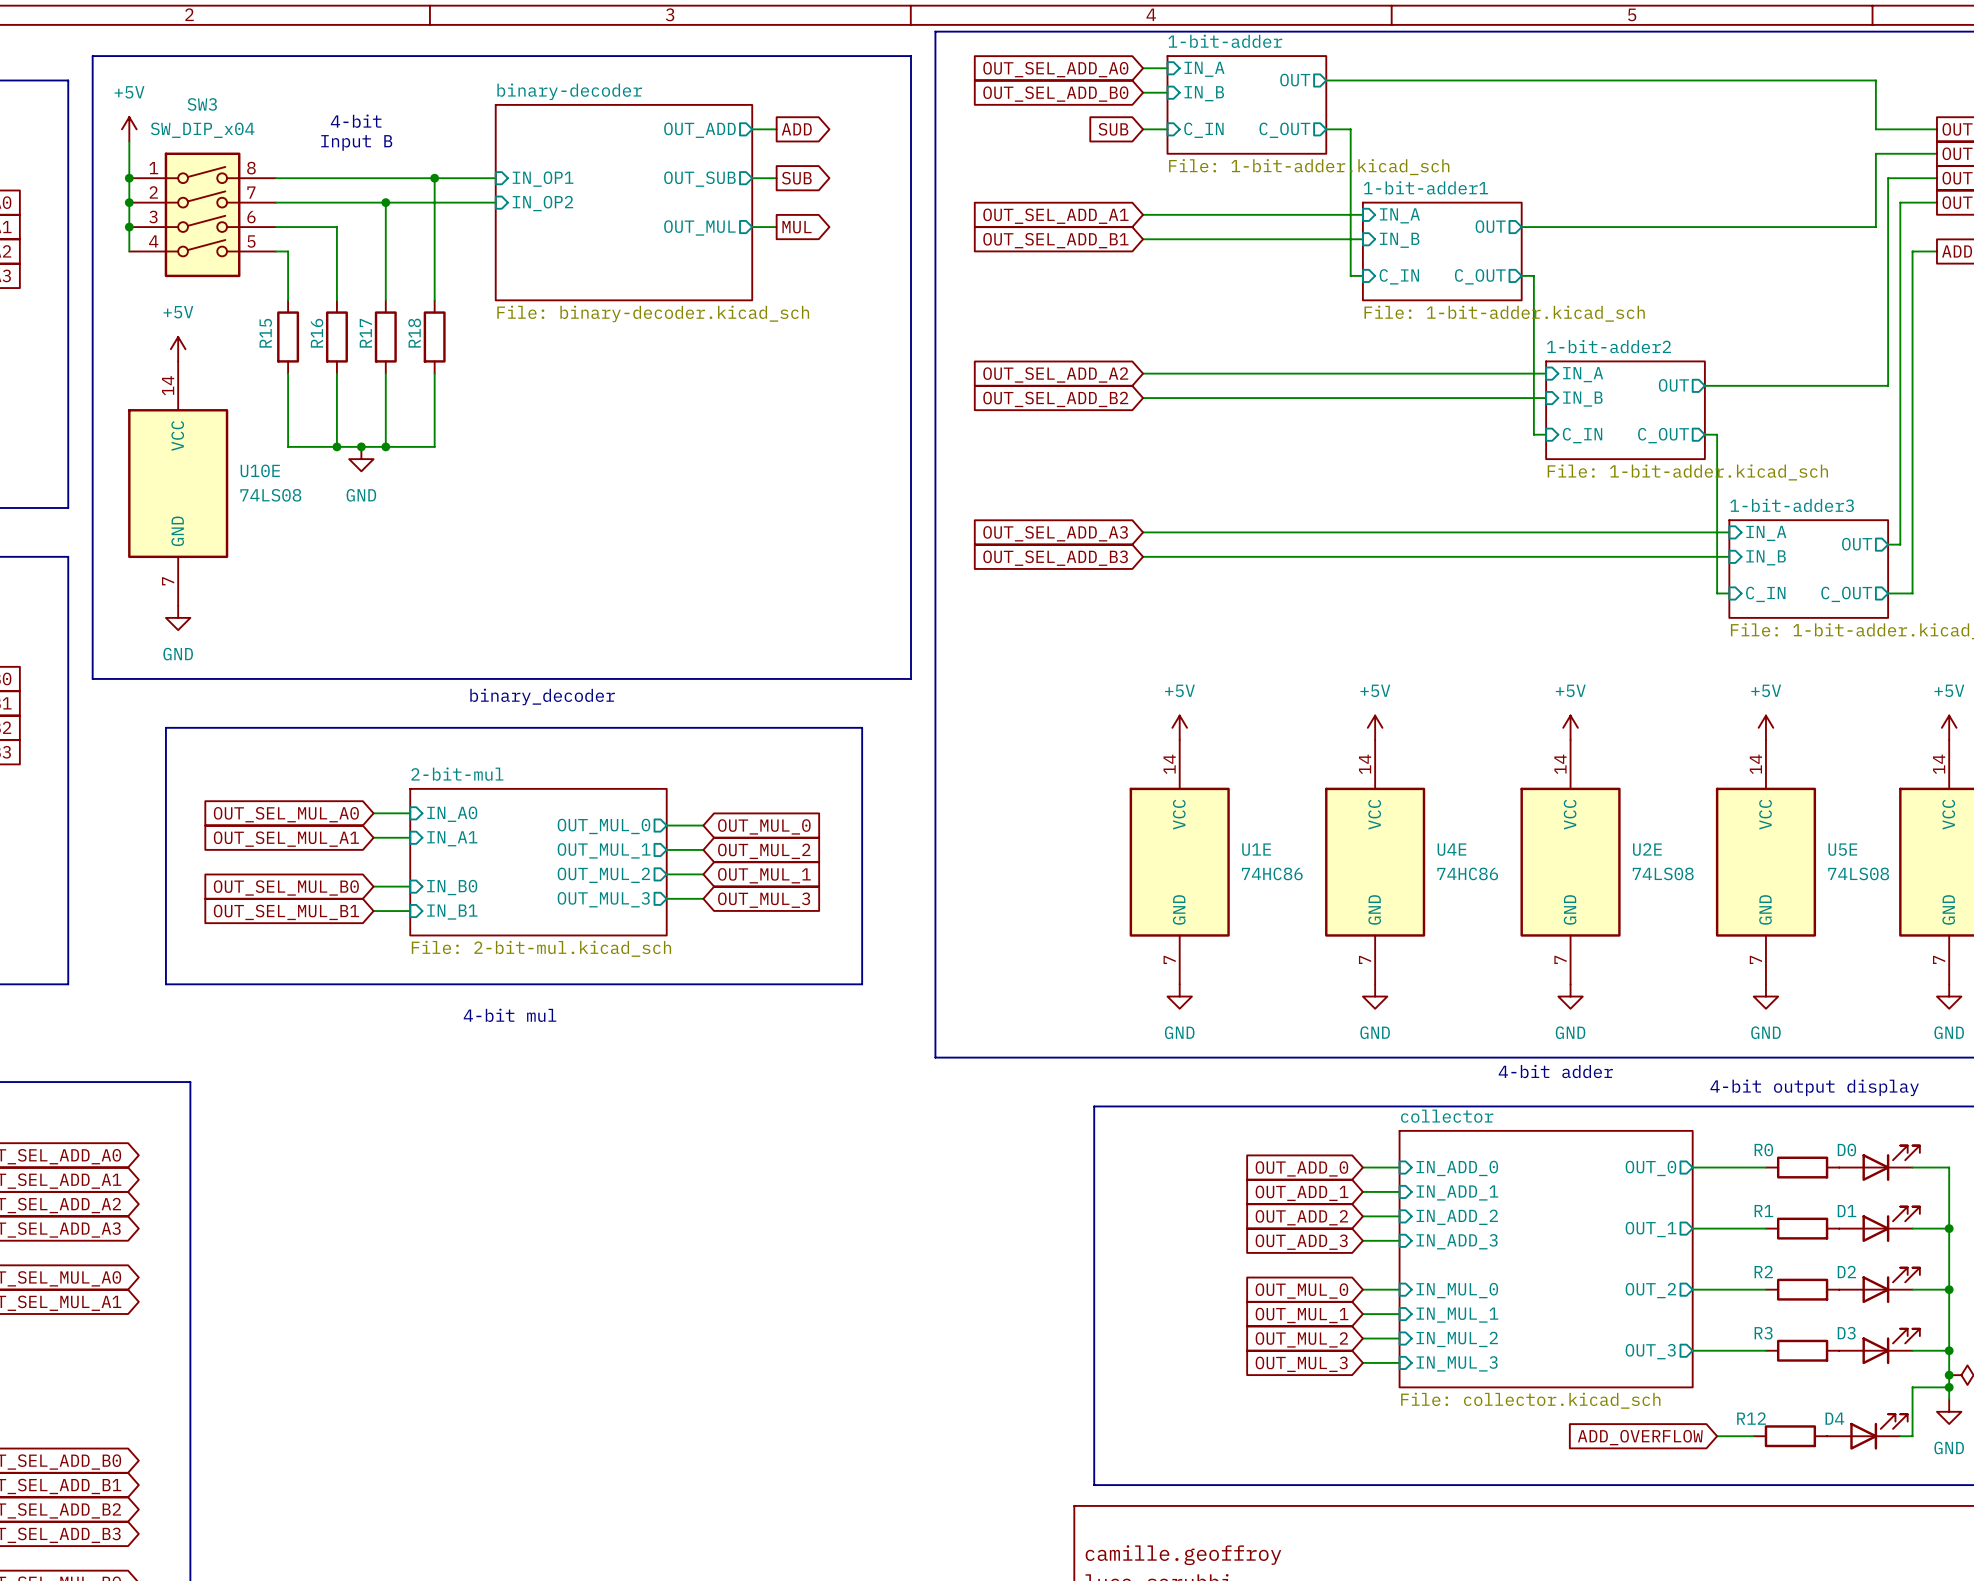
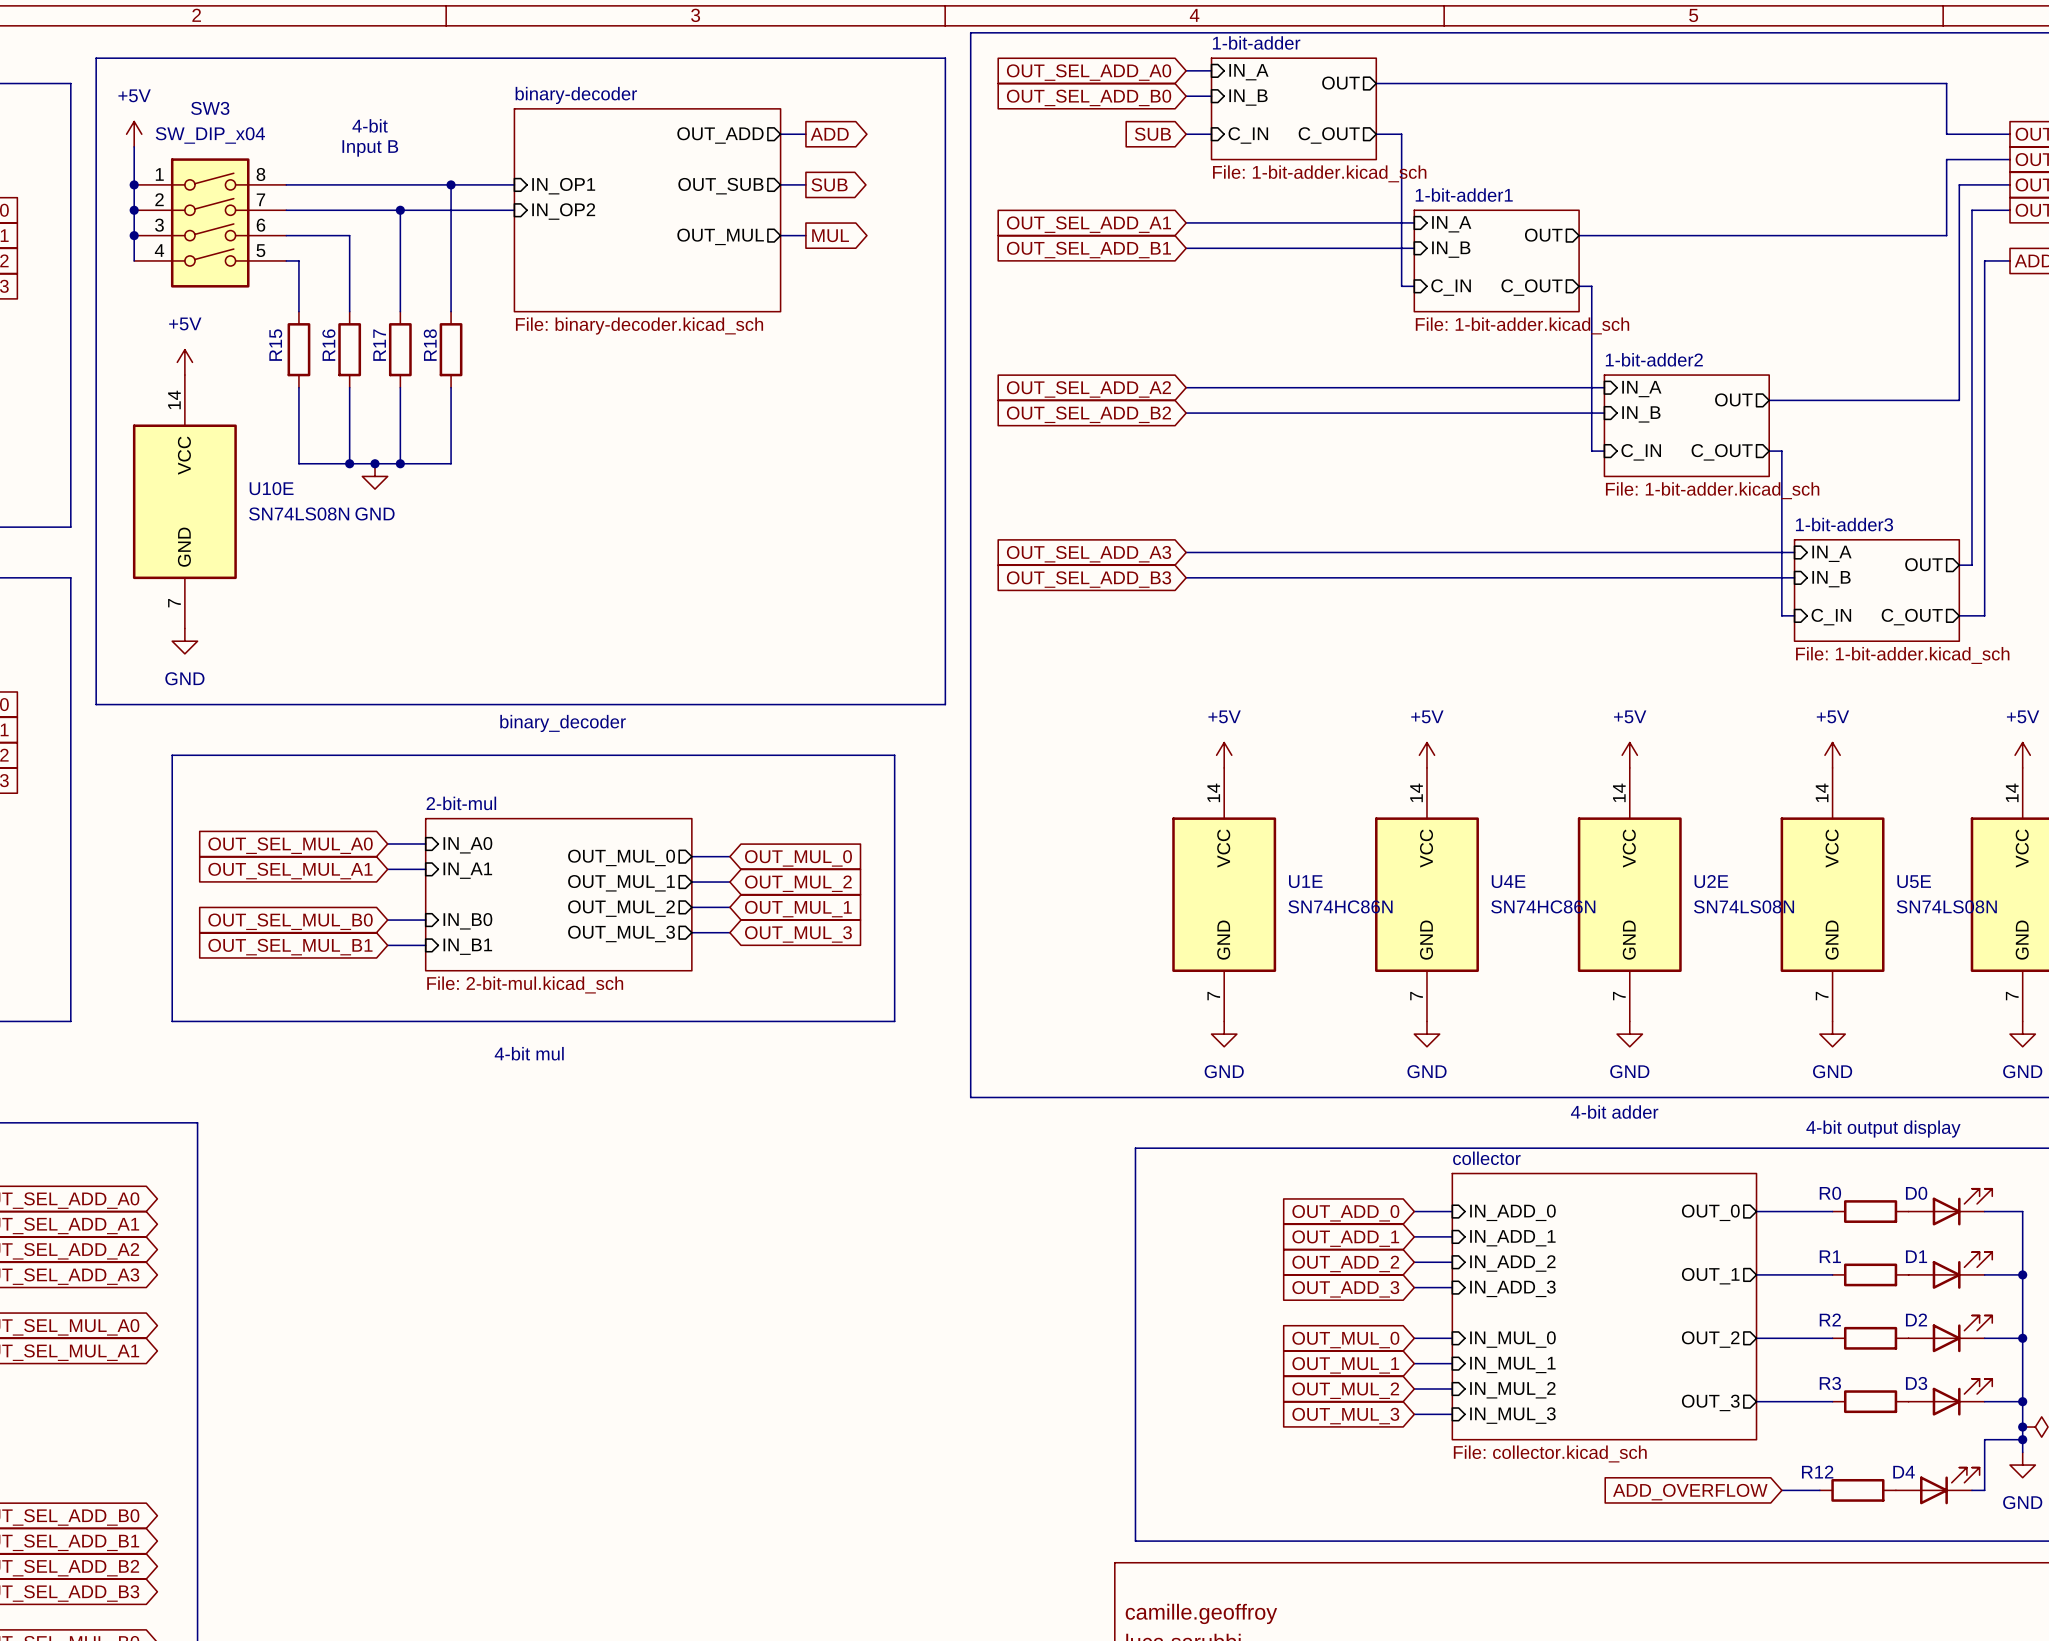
U10E value: 74LS08 (270, 495) -> SN74LS08N (299, 513)
U1E value: 74HC86 (1272, 873) -> SN74HC86N (1340, 906)
U4E value: 74HC86 (1467, 873) -> SN74HC86N (1543, 906)
U2E value: 74LS08 (1663, 873) -> SN74LS08N (1744, 906)
U5E value: 74LS08 (1858, 873) -> SN74LS08N (1946, 906)

